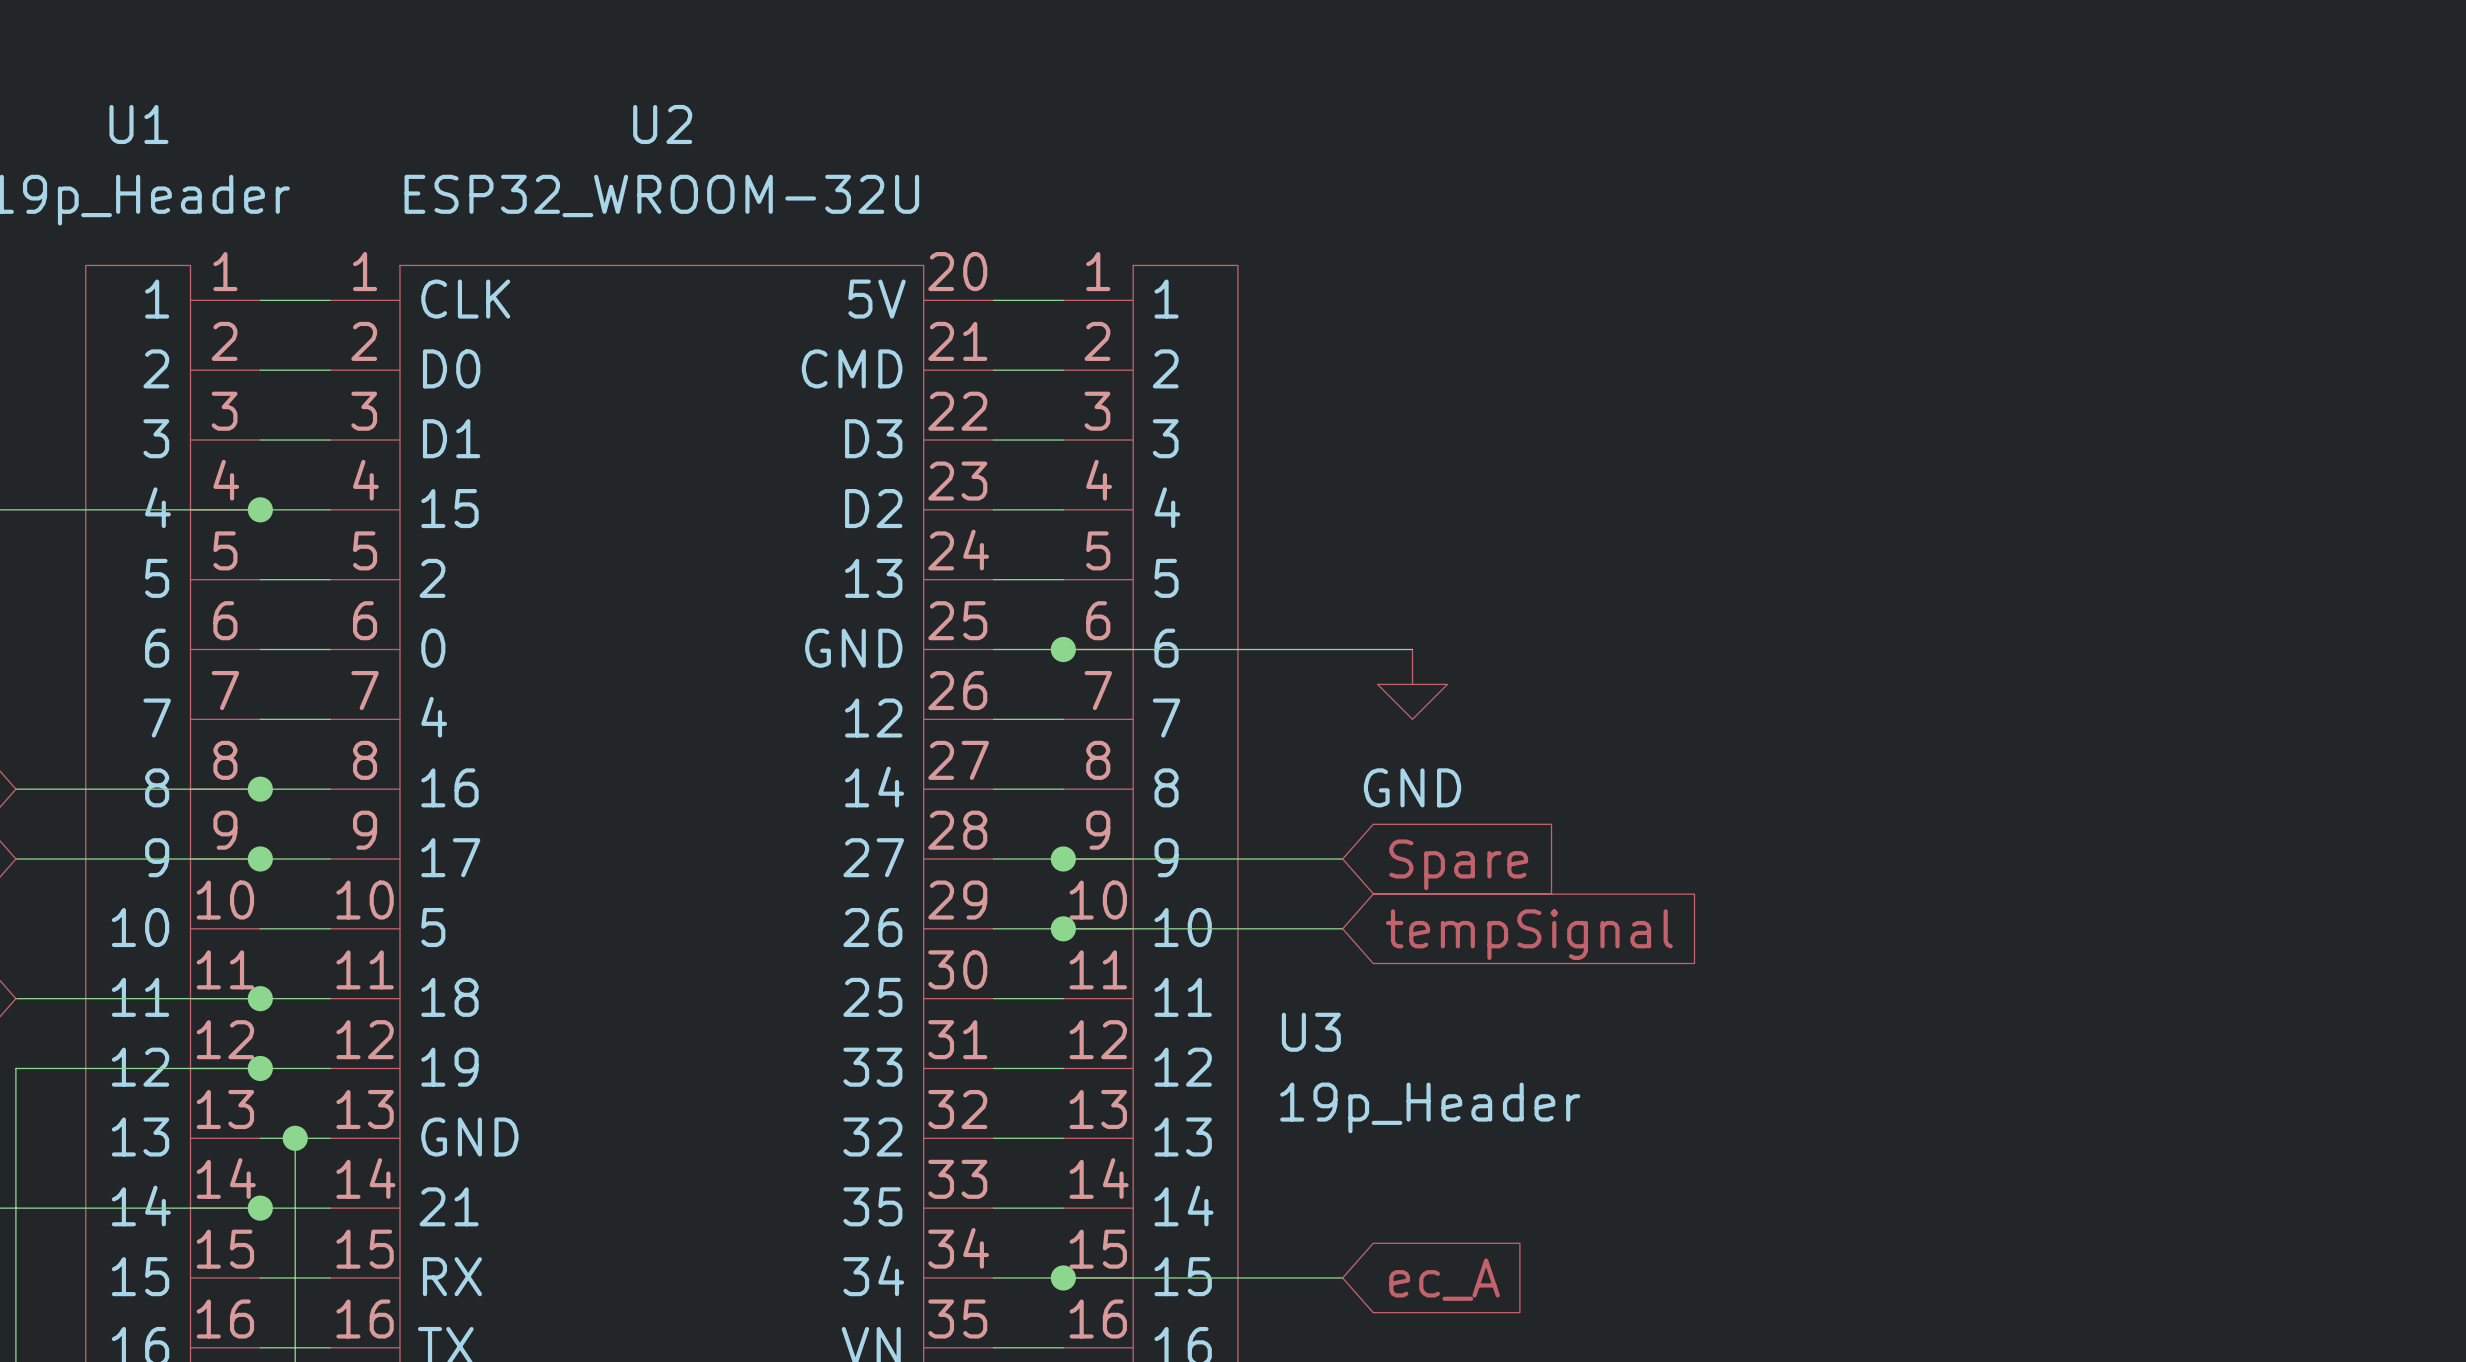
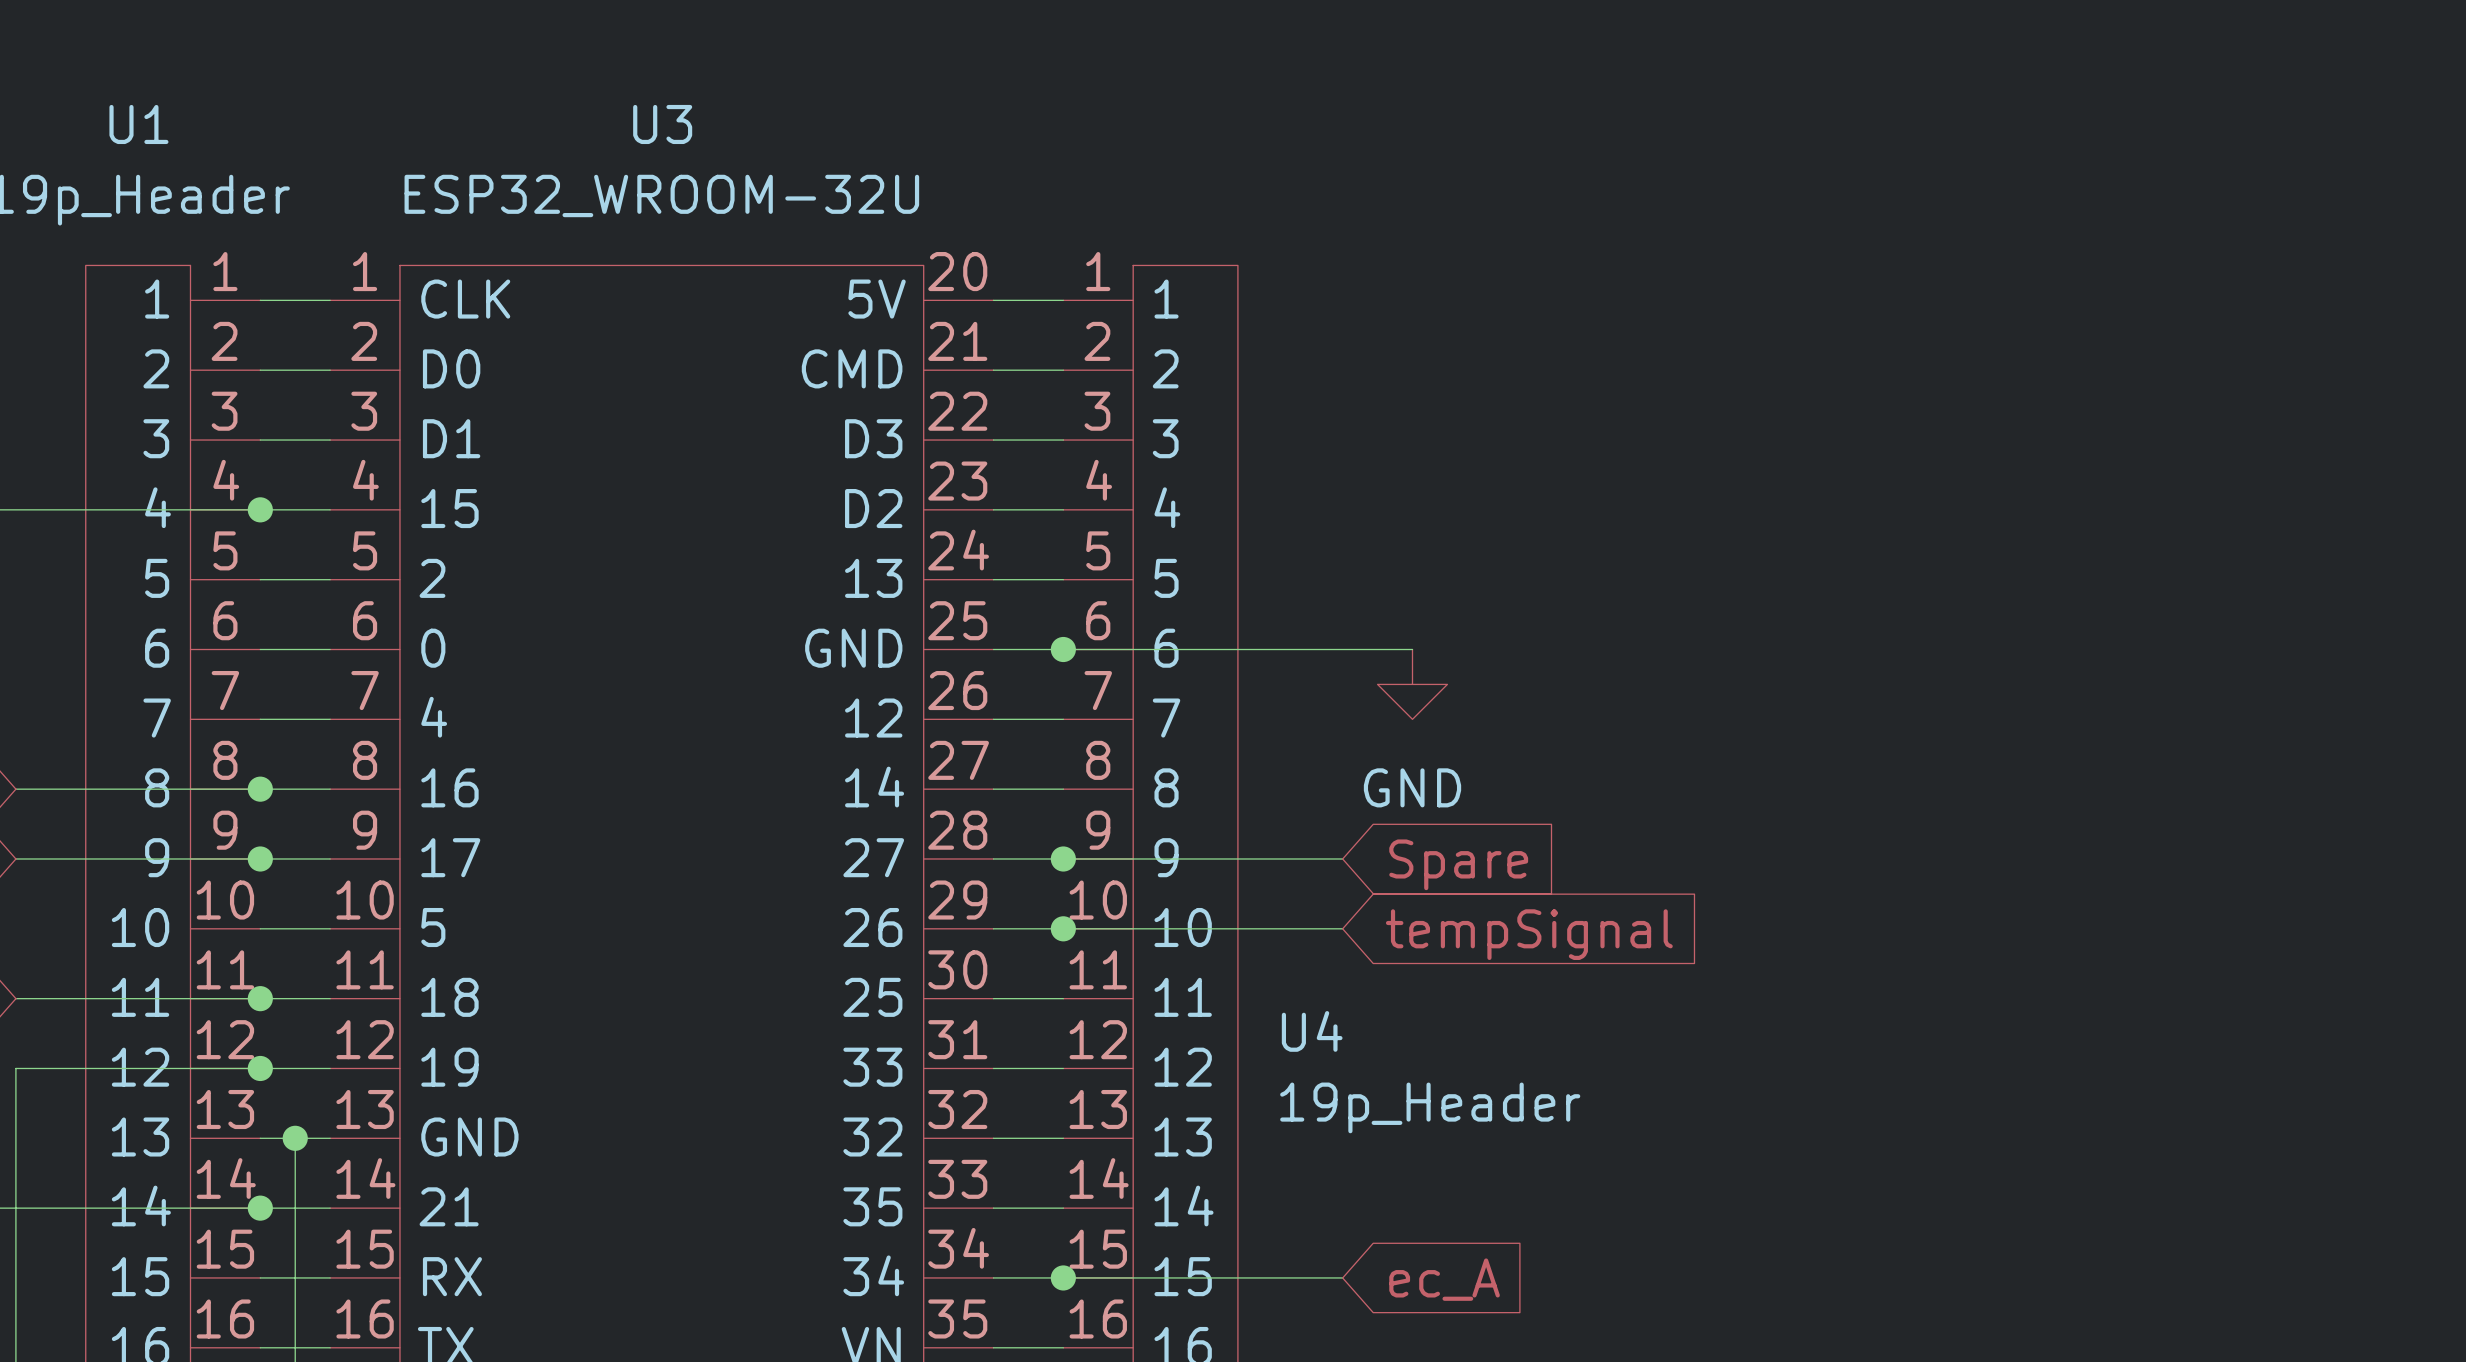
U2 name: U2 (662, 124) -> U3 (662, 124)
U3 name: U3 (1311, 1032) -> U4 (1312, 1031)

